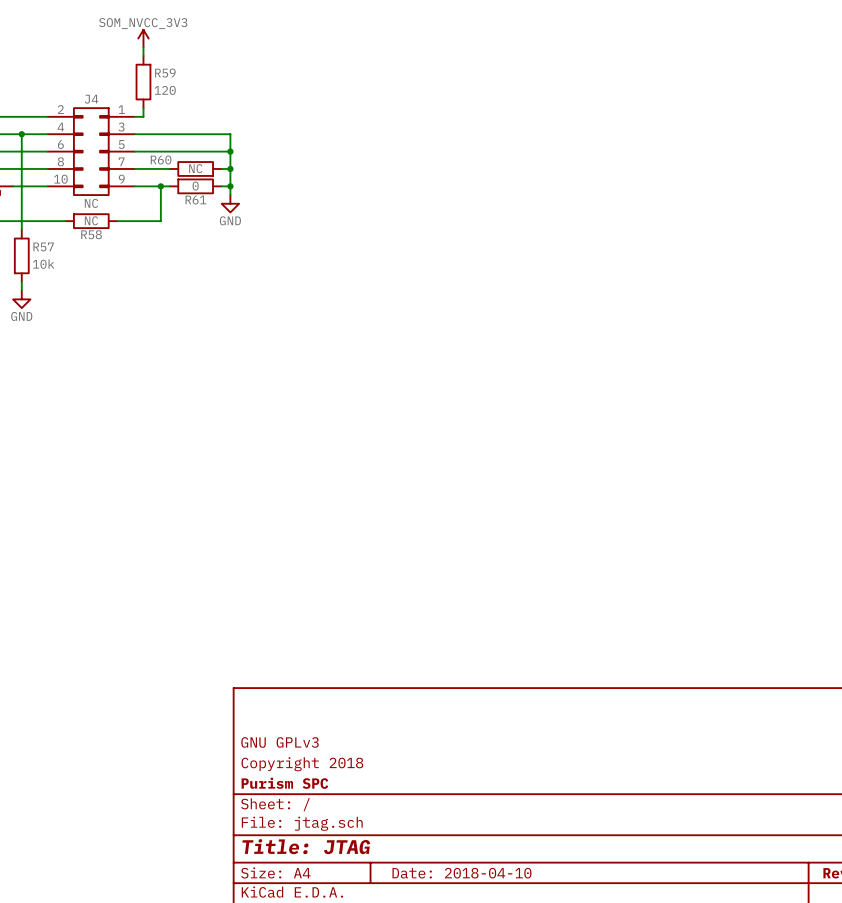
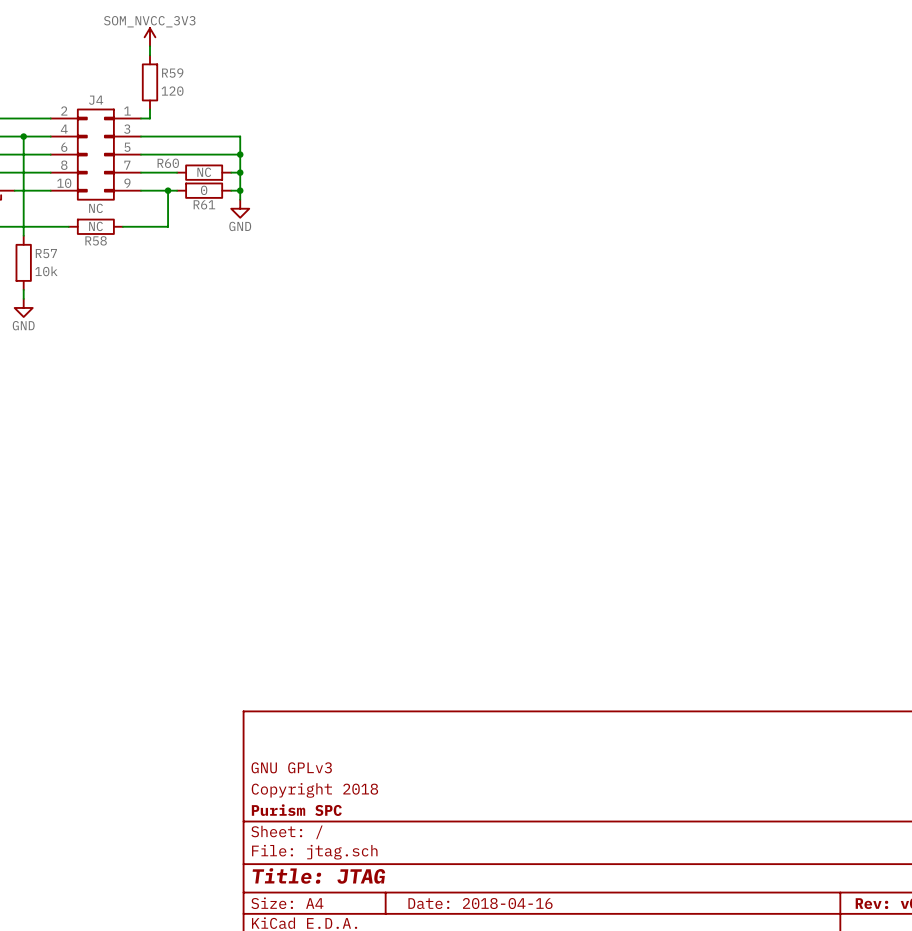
title block: Date: 2018-04-10 (461, 873) -> Date: 2018-04-16 (480, 903)

